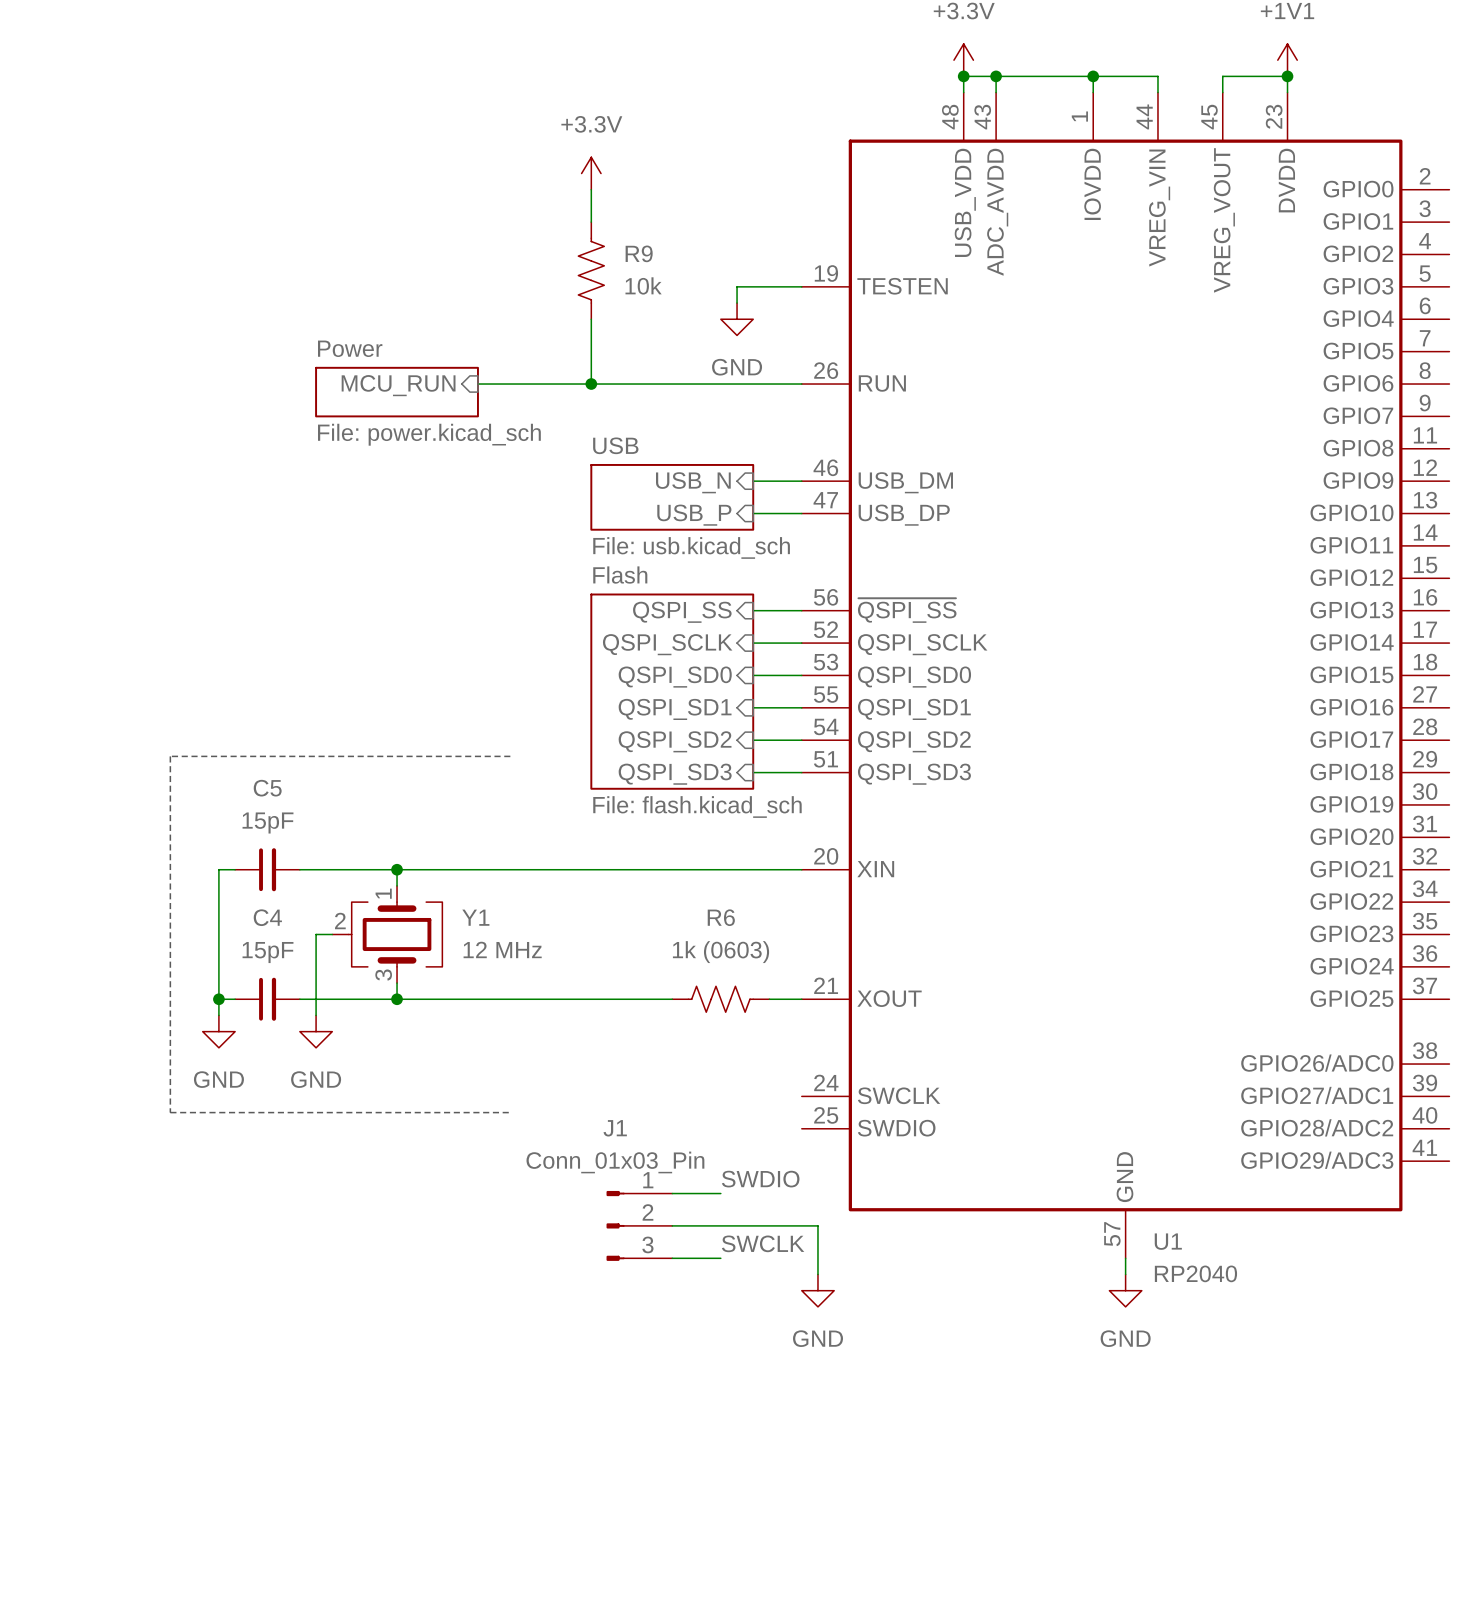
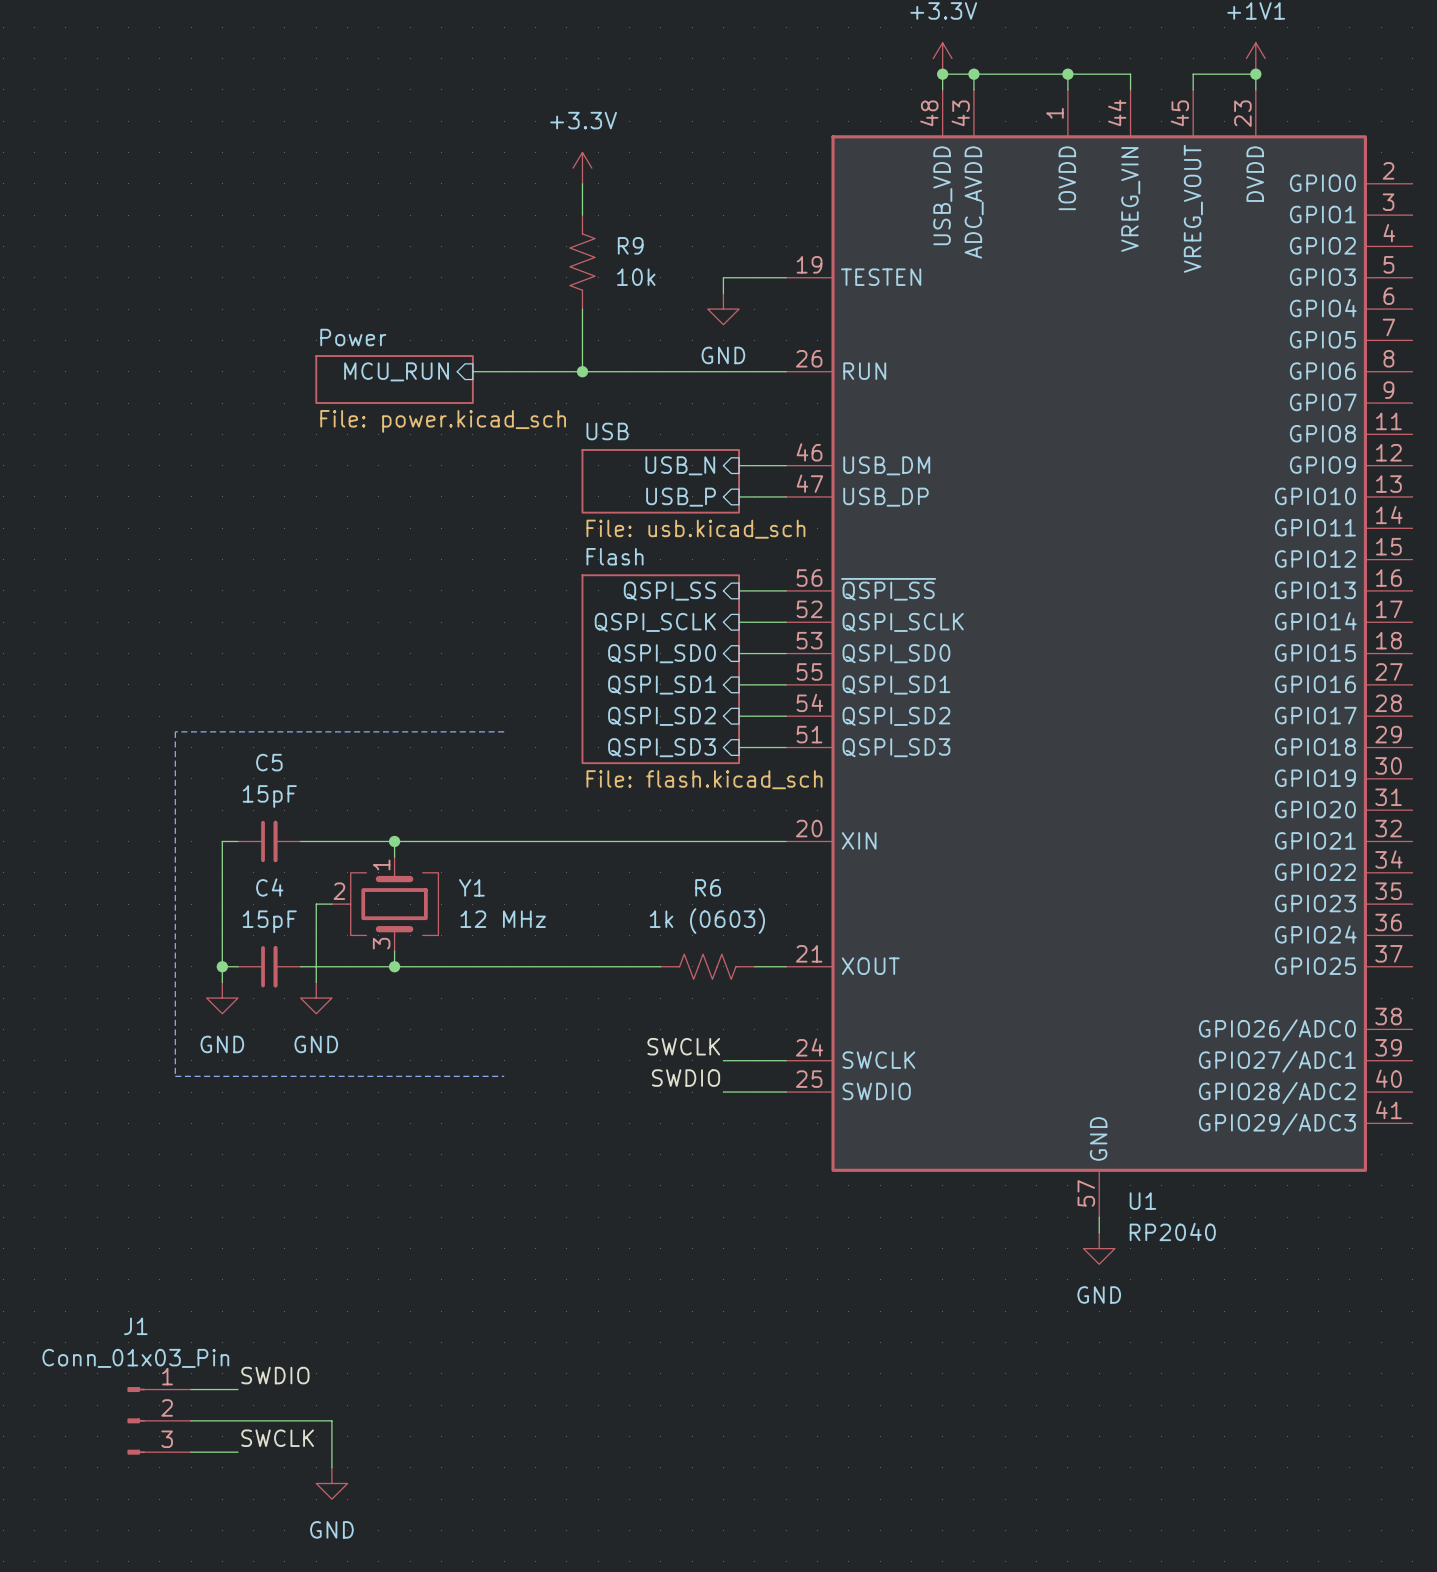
wire: none -> (723, 1060) (786, 1060)
wire: none -> (723, 1092) (786, 1092)
label position: SWDIO (760, 1179) -> SWDIO (686, 1078)
wire: (672, 1193) (720, 1193) -> none
J1 position: (639, 1225) -> (159, 1420)
wire: (672, 1225) (817, 1225) (817, 1274) -> none
label position: SWCLK (763, 1243) -> SWCLK (683, 1046)
wire: (672, 1258) (720, 1258) -> none
power symbol: GND (817, 1290) -> none
label: none -> SWDIO (275, 1375)
wire: none -> (191, 1389) (237, 1389)
wire: none -> (191, 1420) (331, 1420) (331, 1467)
label: none -> SWCLK (277, 1438)
wire: none -> (191, 1452) (237, 1452)
power symbol: none -> GND (331, 1483)

